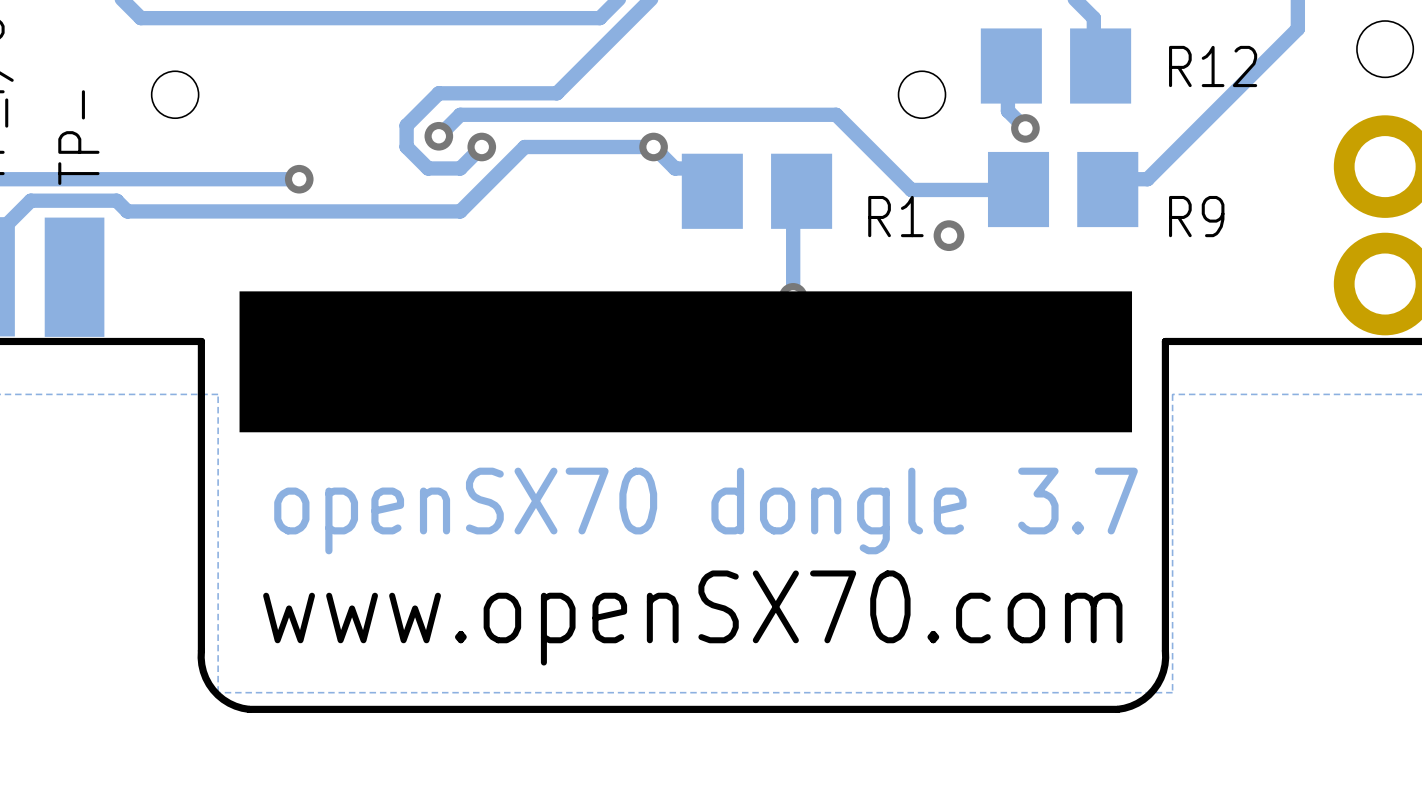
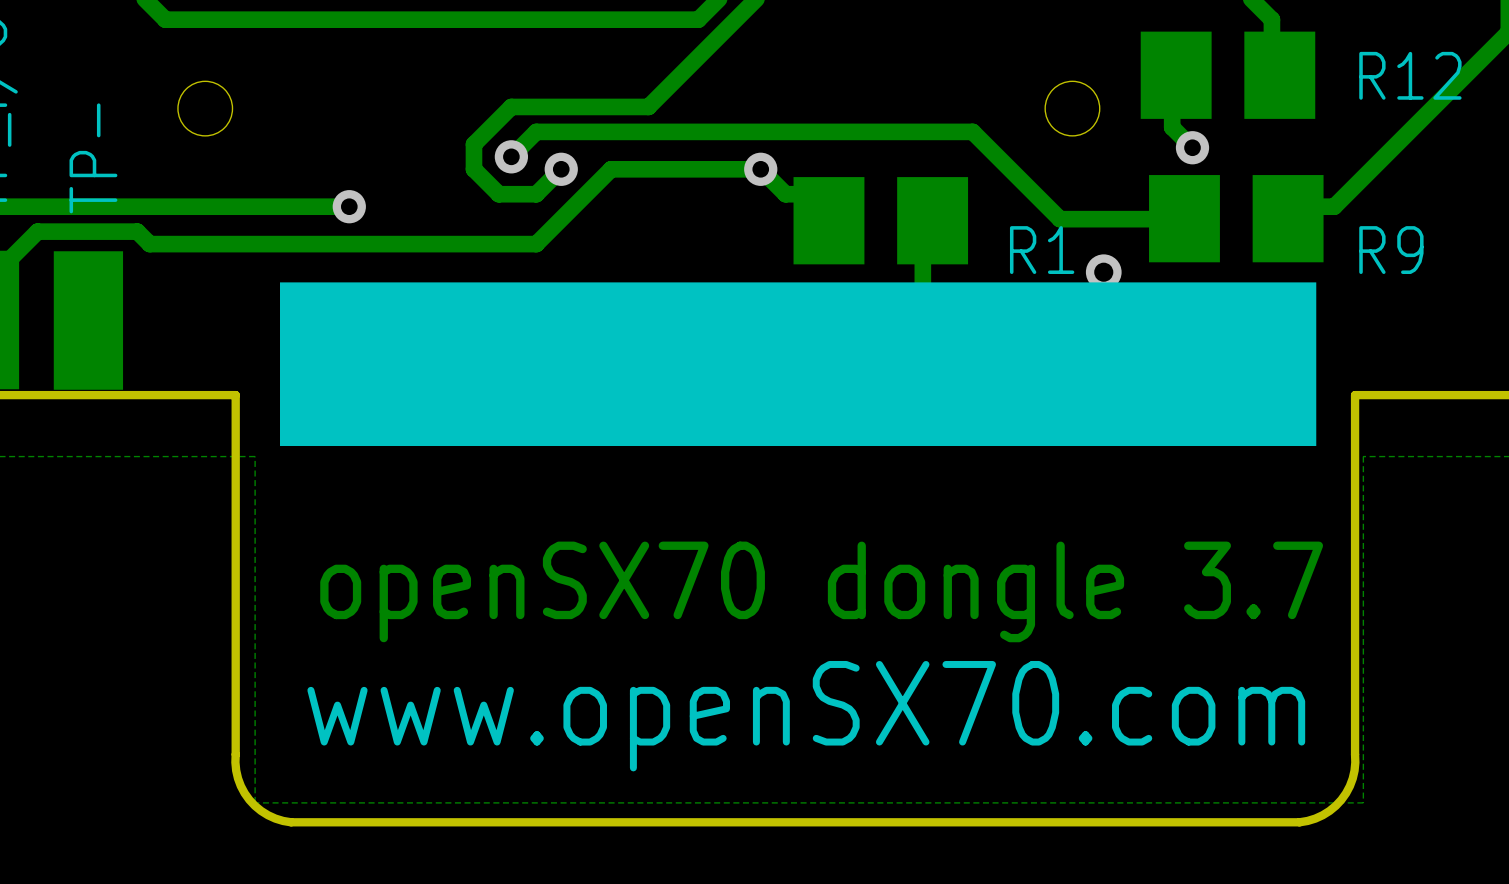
drawing position: (685, 361) -> (798, 364)

